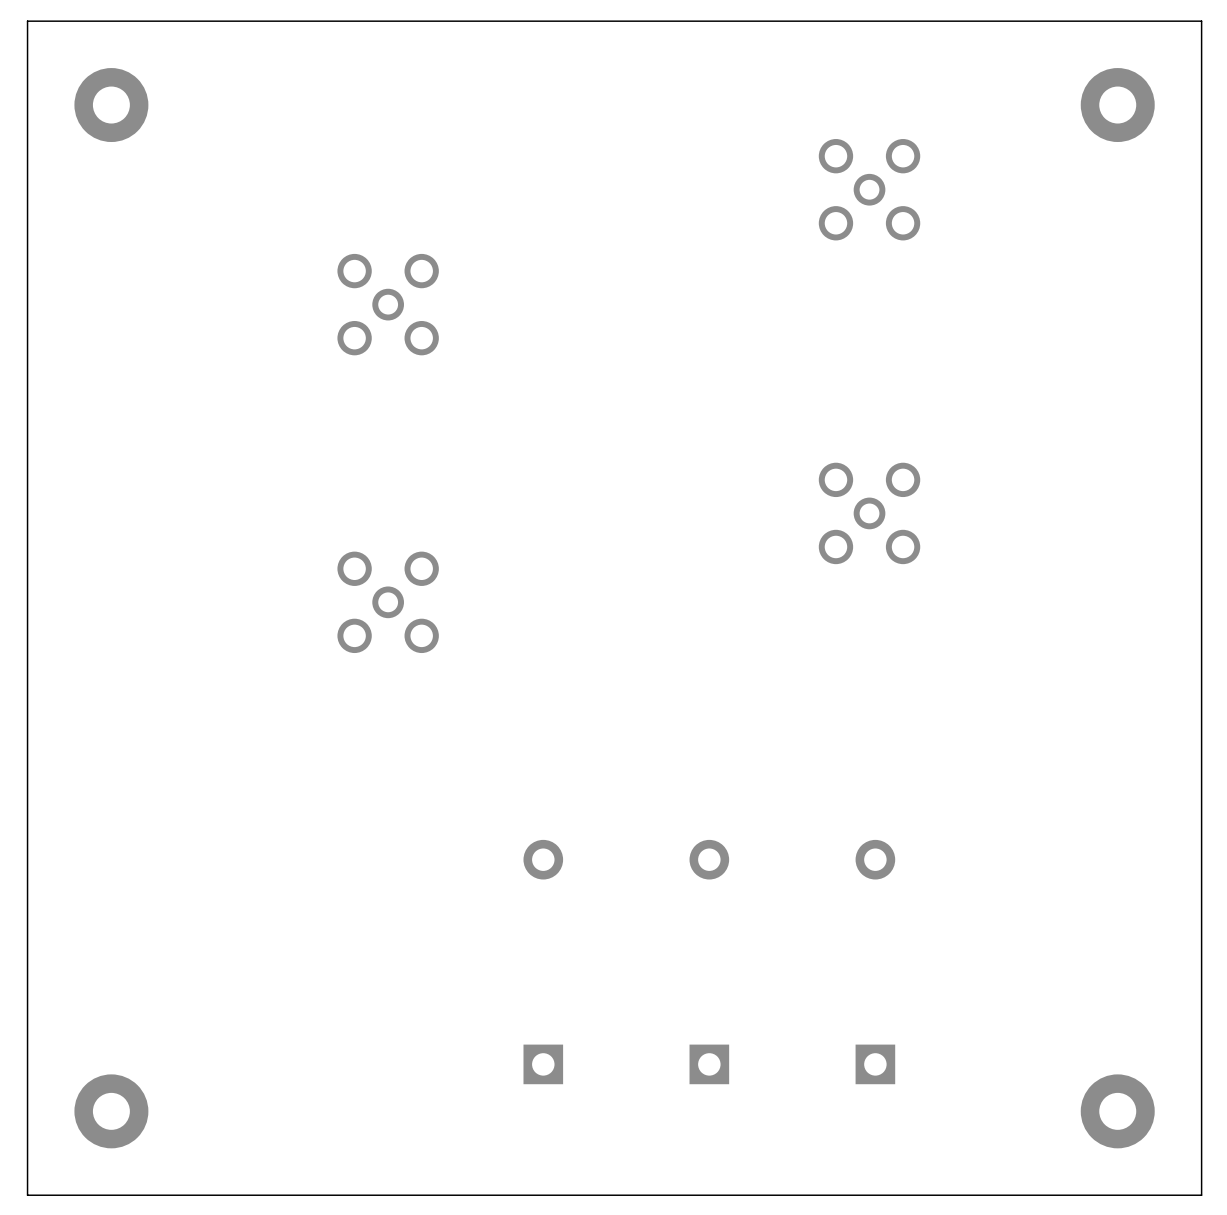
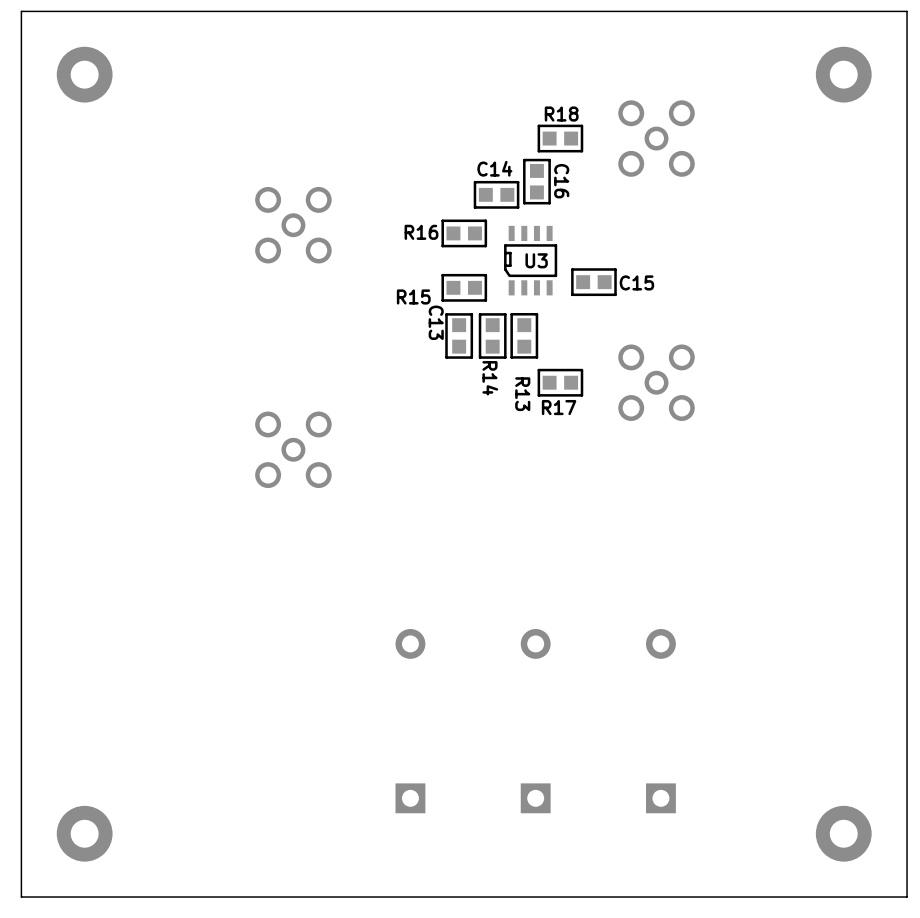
R18: none -> (560, 138)
C16: none -> (536, 181)
C14: none -> (496, 194)
R16: none -> (464, 233)
U3: none -> (530, 260)
C15: none -> (593, 282)
R15: none -> (464, 287)
C13: none -> (459, 335)
R14: none -> (492, 335)
R13: none -> (524, 335)
R17: none -> (560, 382)

